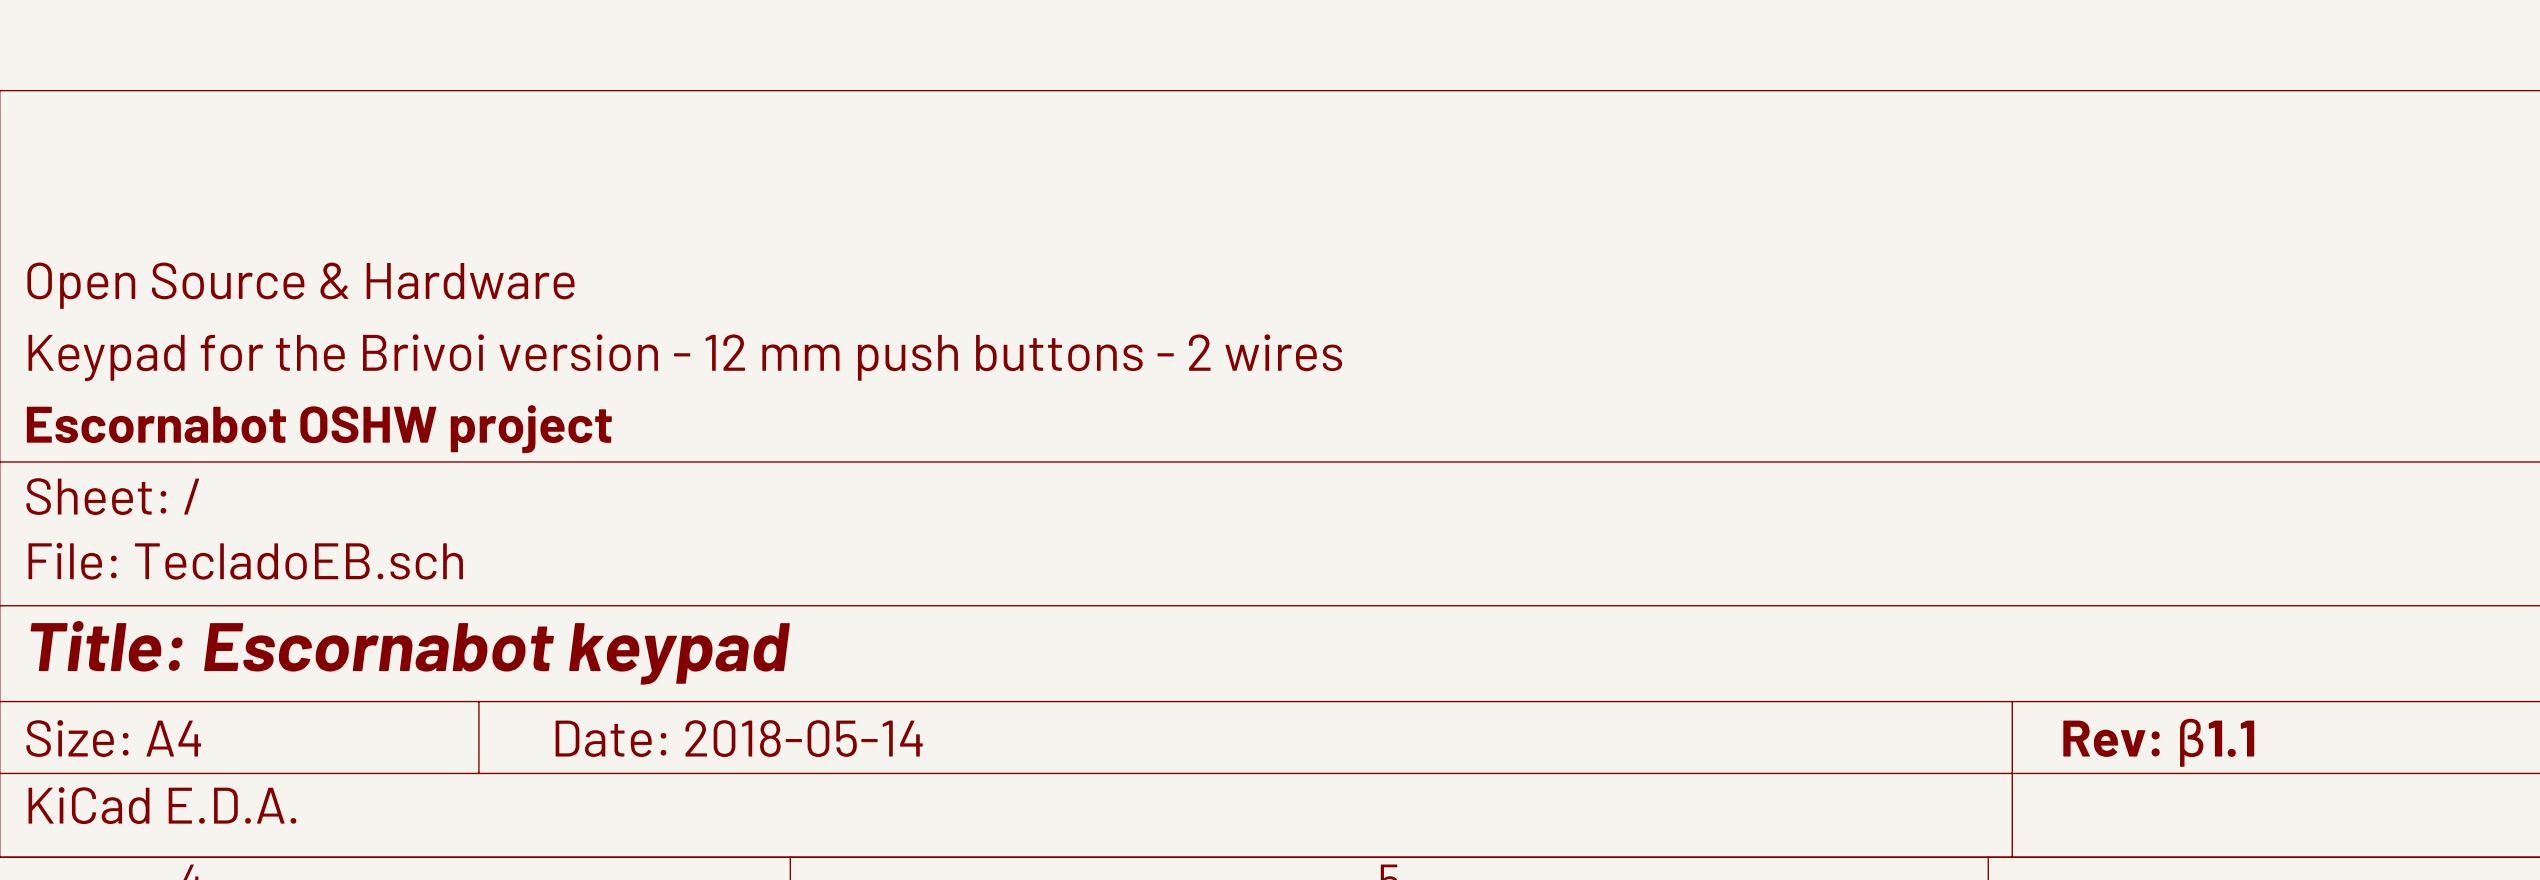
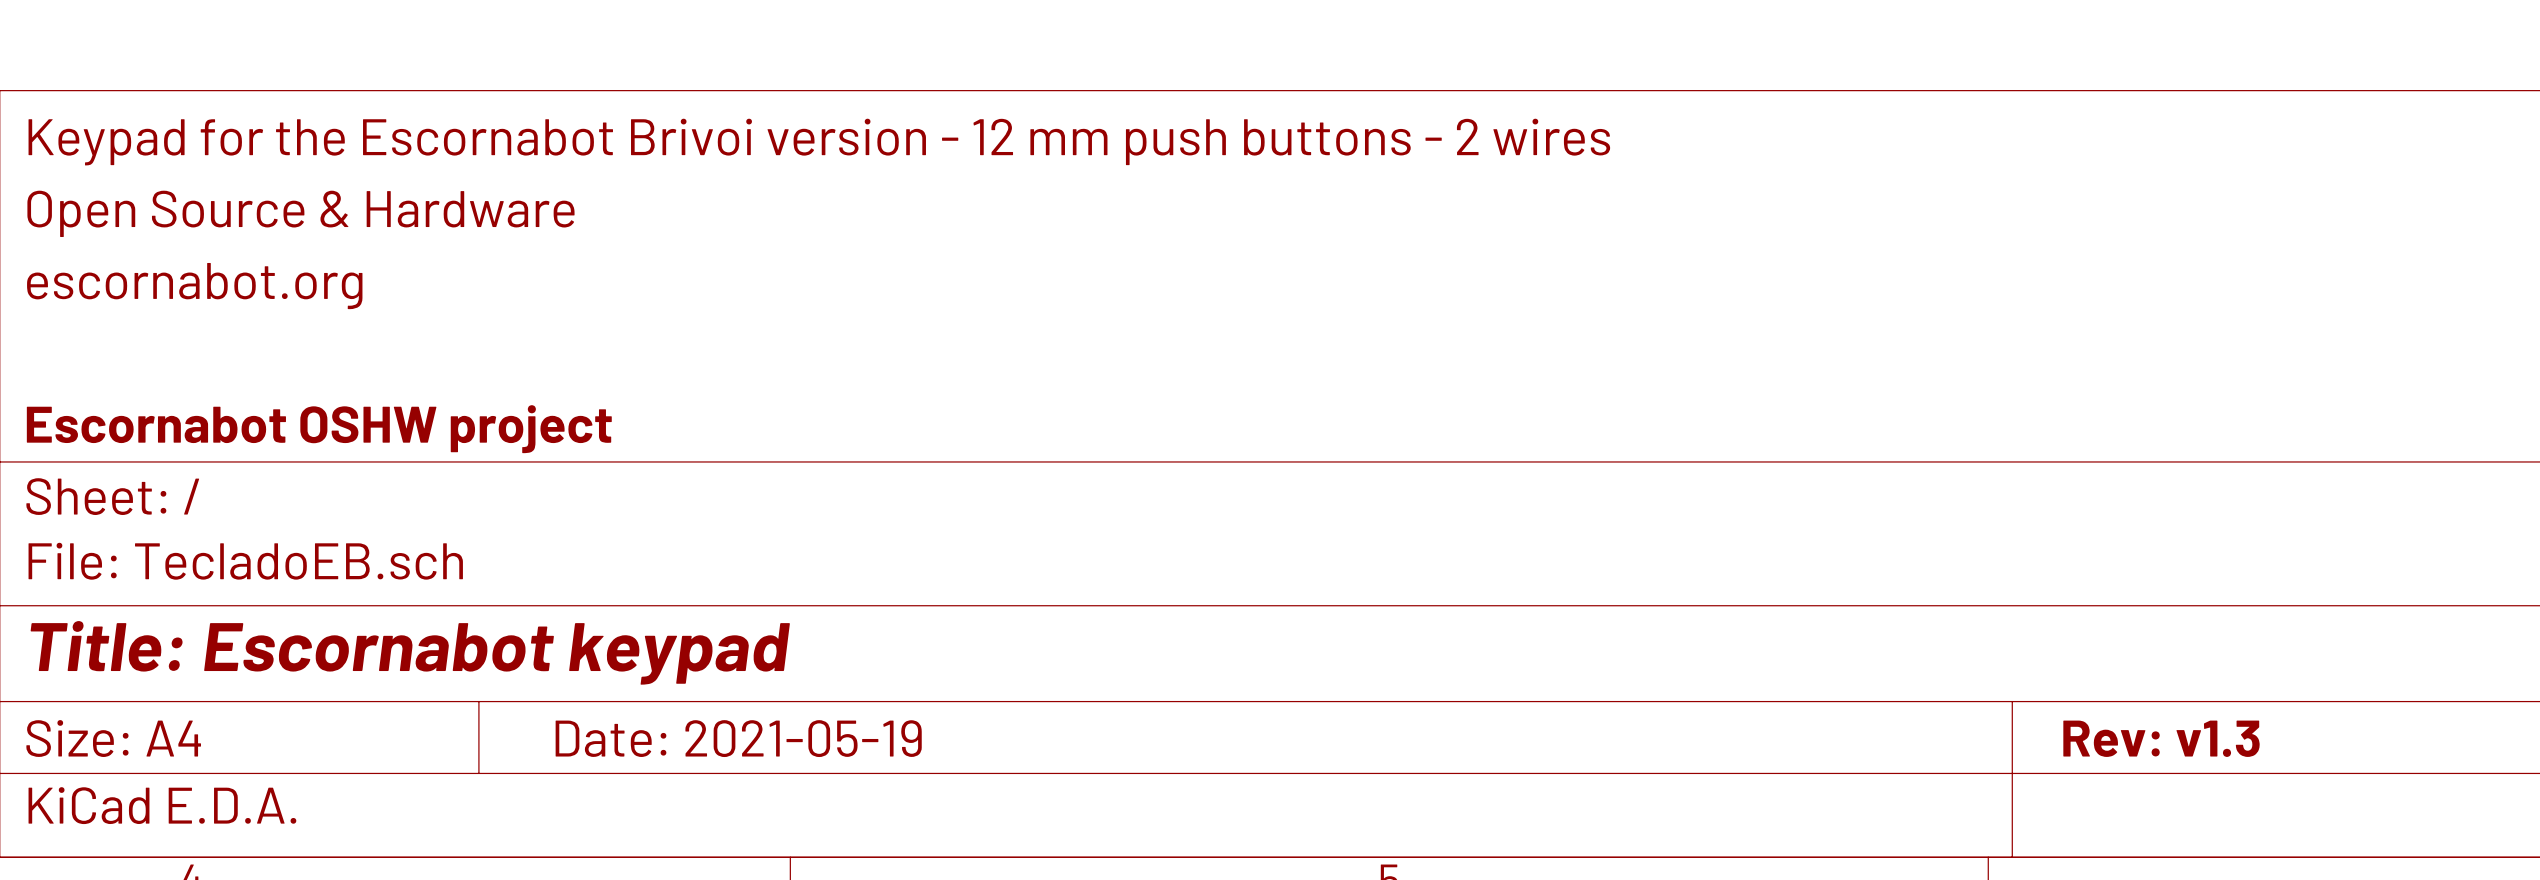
title block: none -> Keypad for the Escornabot Brivoi version - 12 mm push buttons - 2 wires (819, 142)
title block: none -> Open Source & Hardware (300, 213)
title block: Open Source & Hardware (300, 285) -> escornabot.org (194, 286)
title block: Keypad for the Brivoi version - 12 mm push buttons - 2 wires (685, 357) -> none
title block: Date: 2018-05-14 (739, 738) -> Date: 2021-05-19 (738, 738)
title block: Rev: β1.1 (2158, 742) -> Rev: v1.3 (2161, 738)

